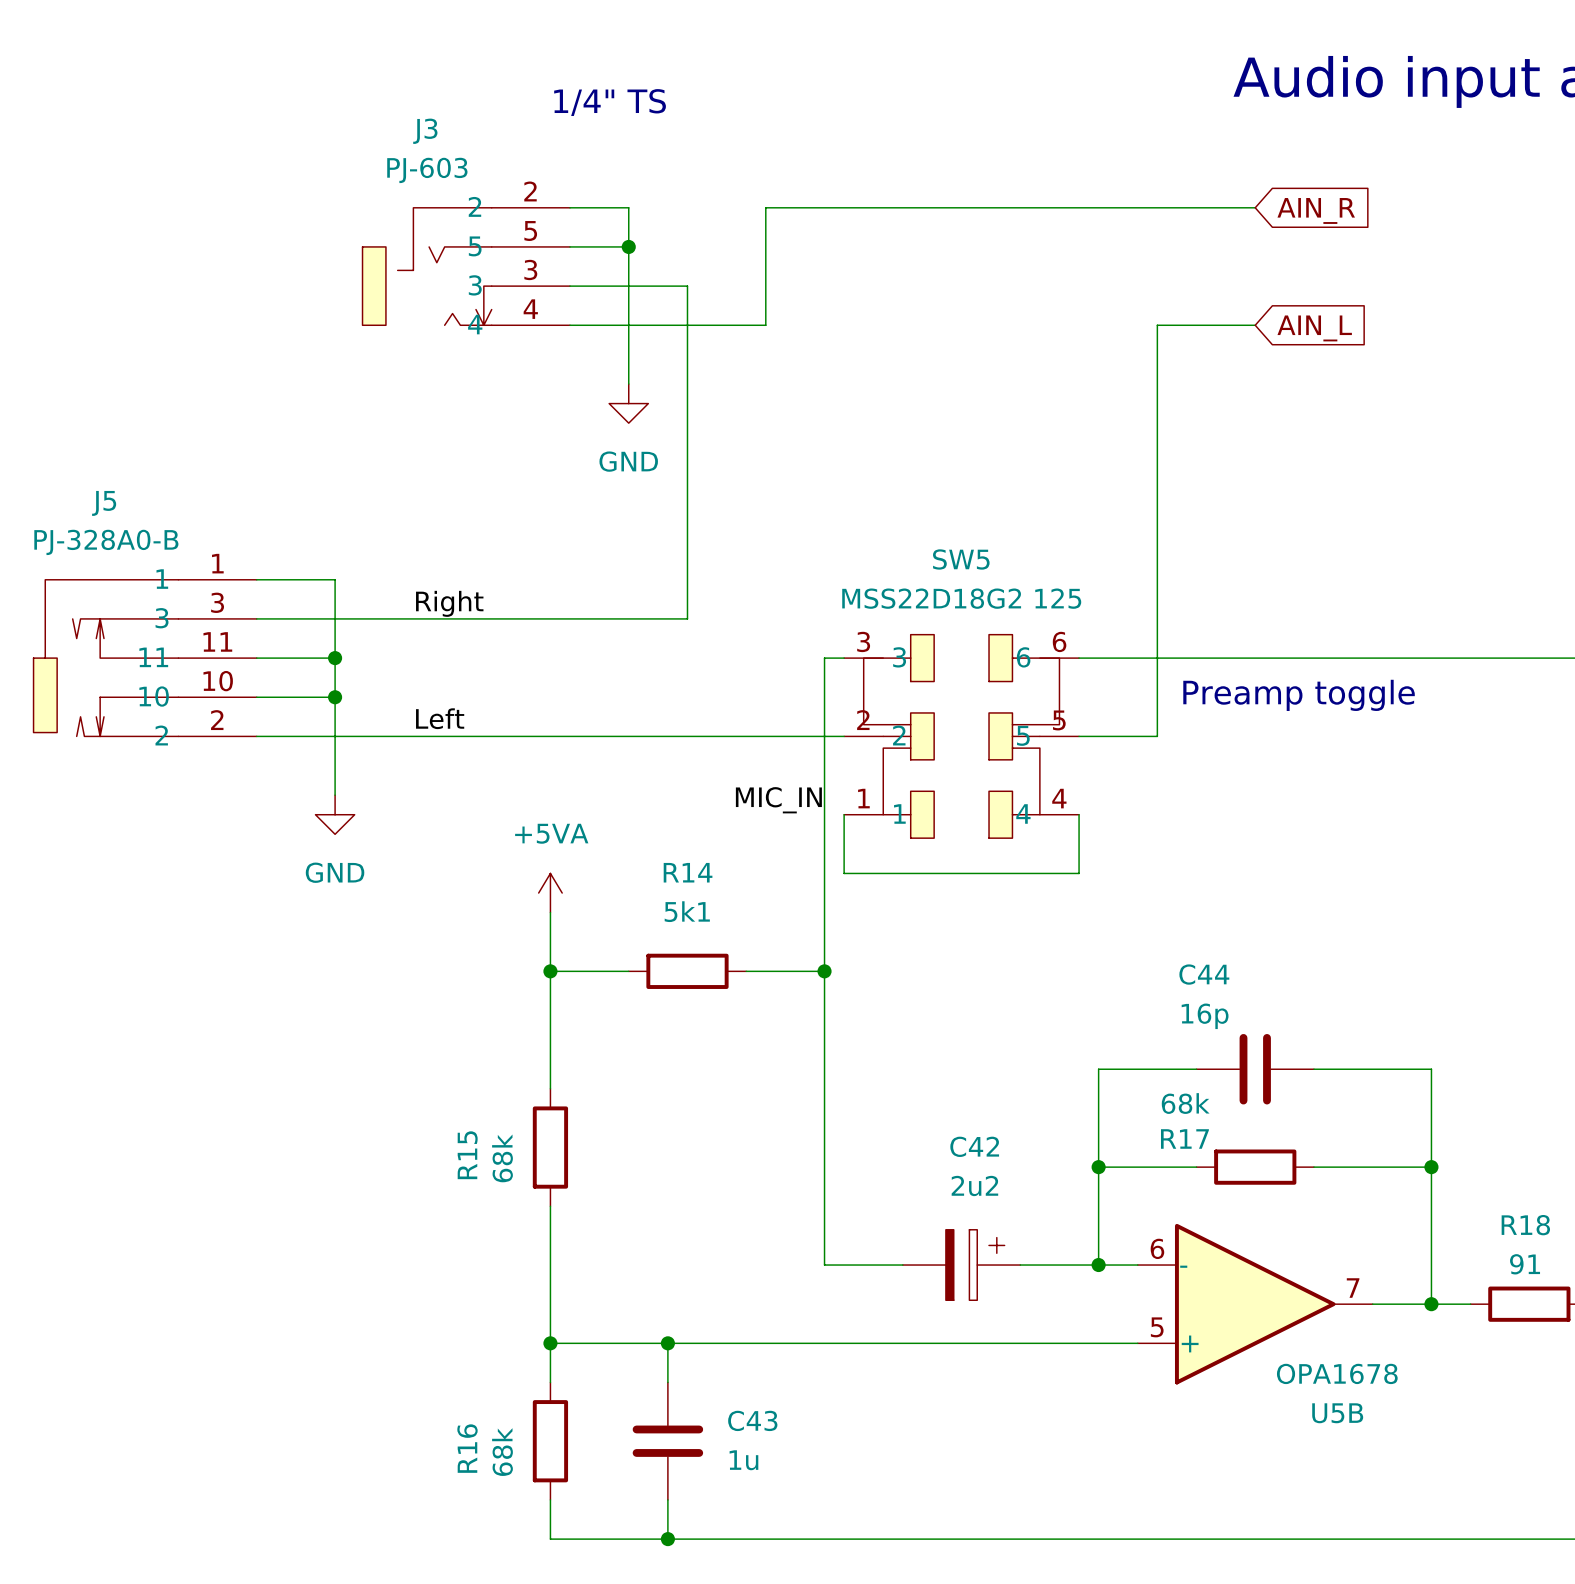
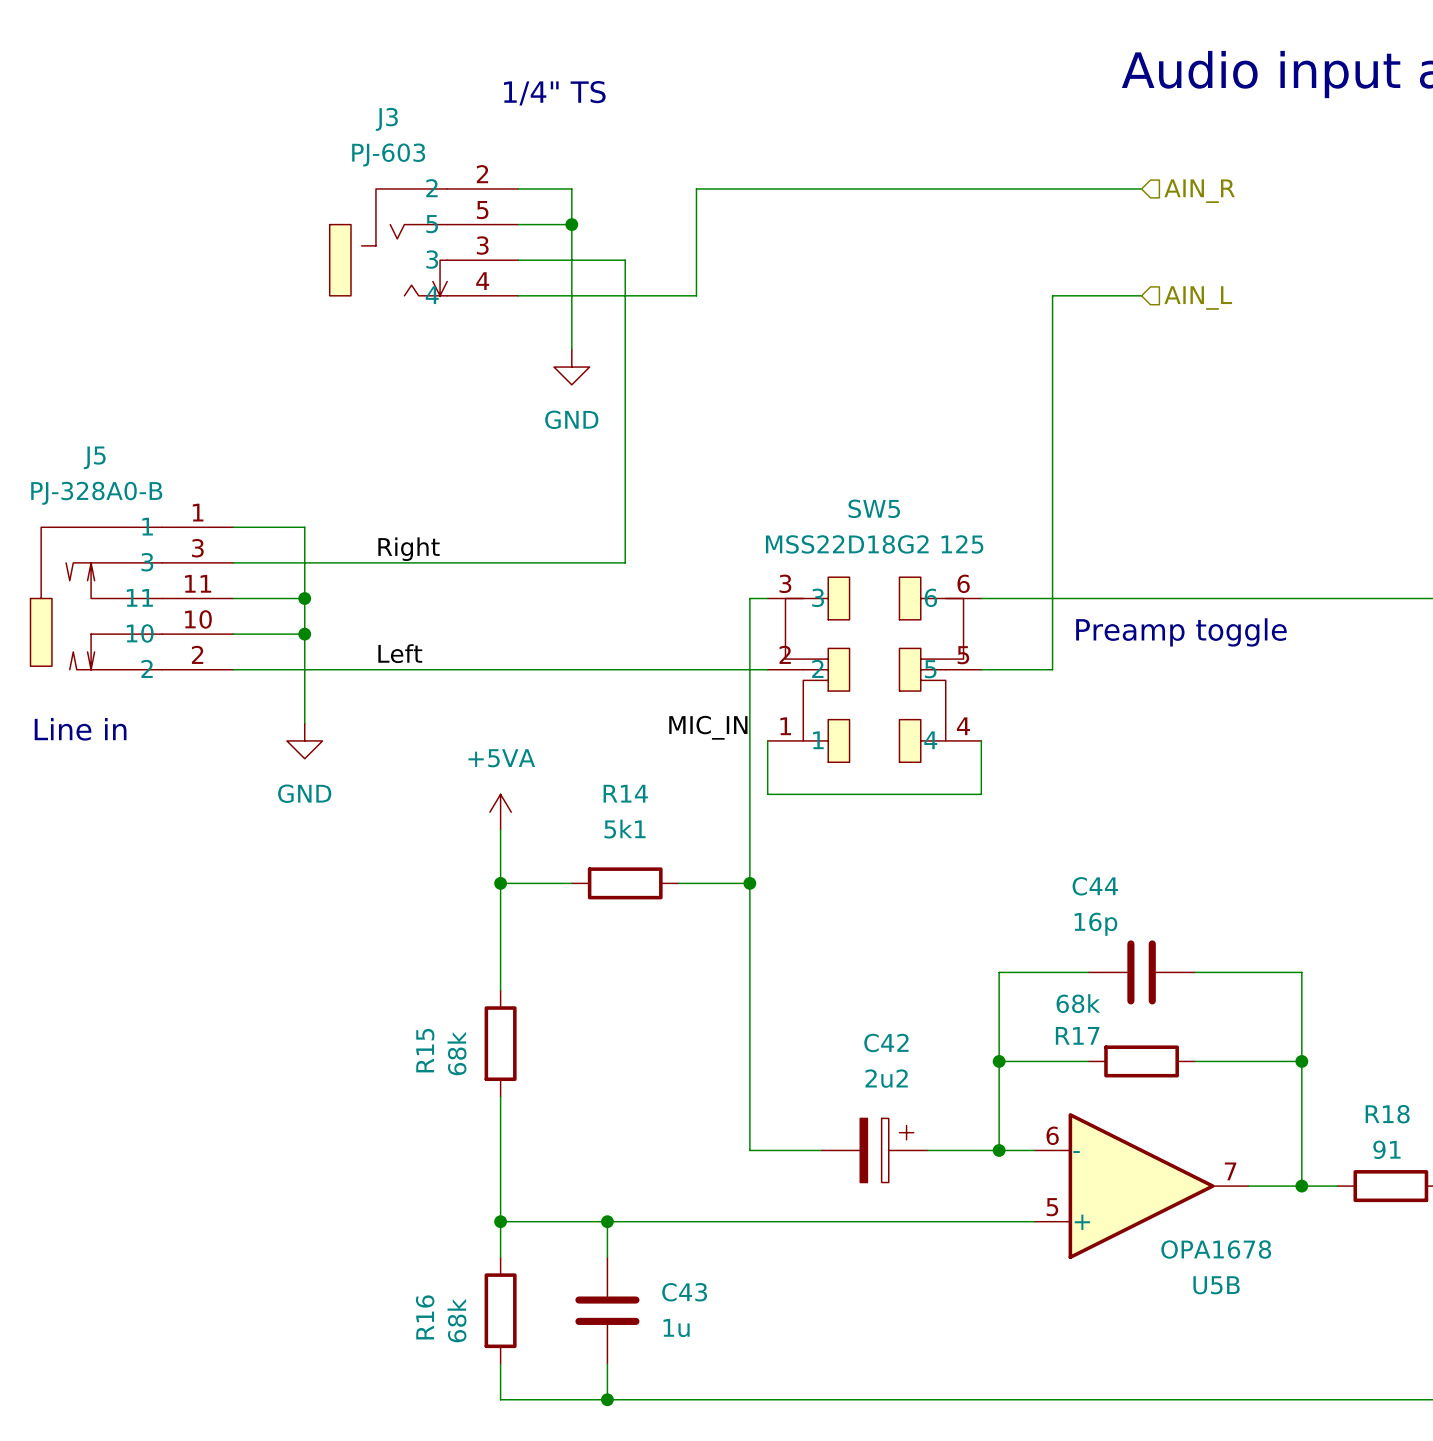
global label: AIN_R (1316, 210) -> none
hierarchical label: none -> AIN_R (1199, 191)
hierarchical label: none -> AIN_L (1198, 298)
global label: AIN_L (1314, 328) -> none
text: none -> Line in (80, 729)

